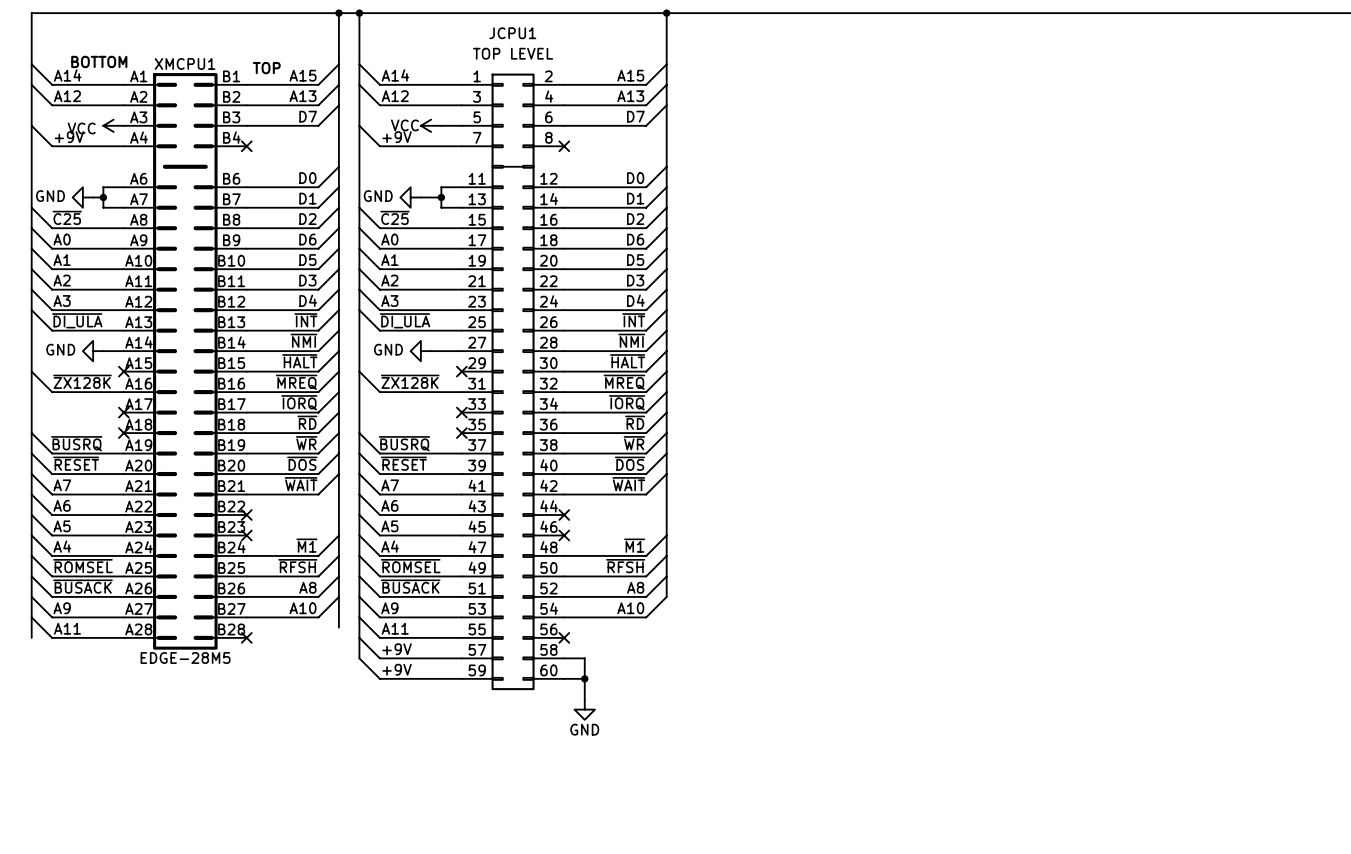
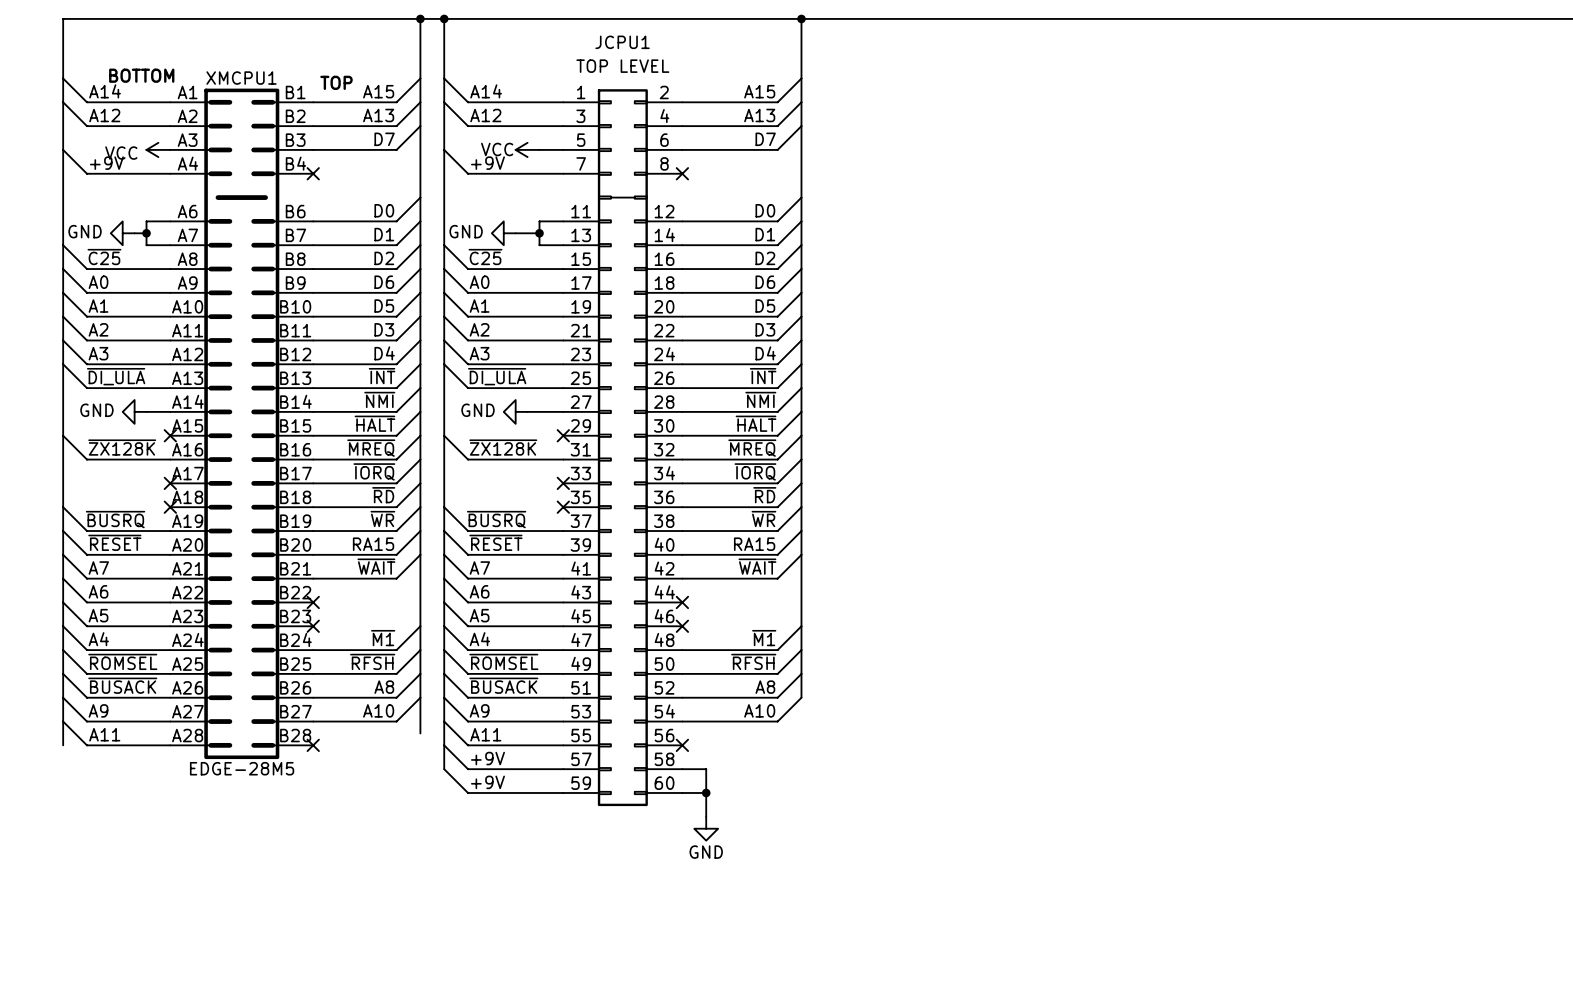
label: ~{DOS} (302, 463) -> RA15 (373, 544)
label: ~{DOS} (630, 463) -> RA15 (754, 544)

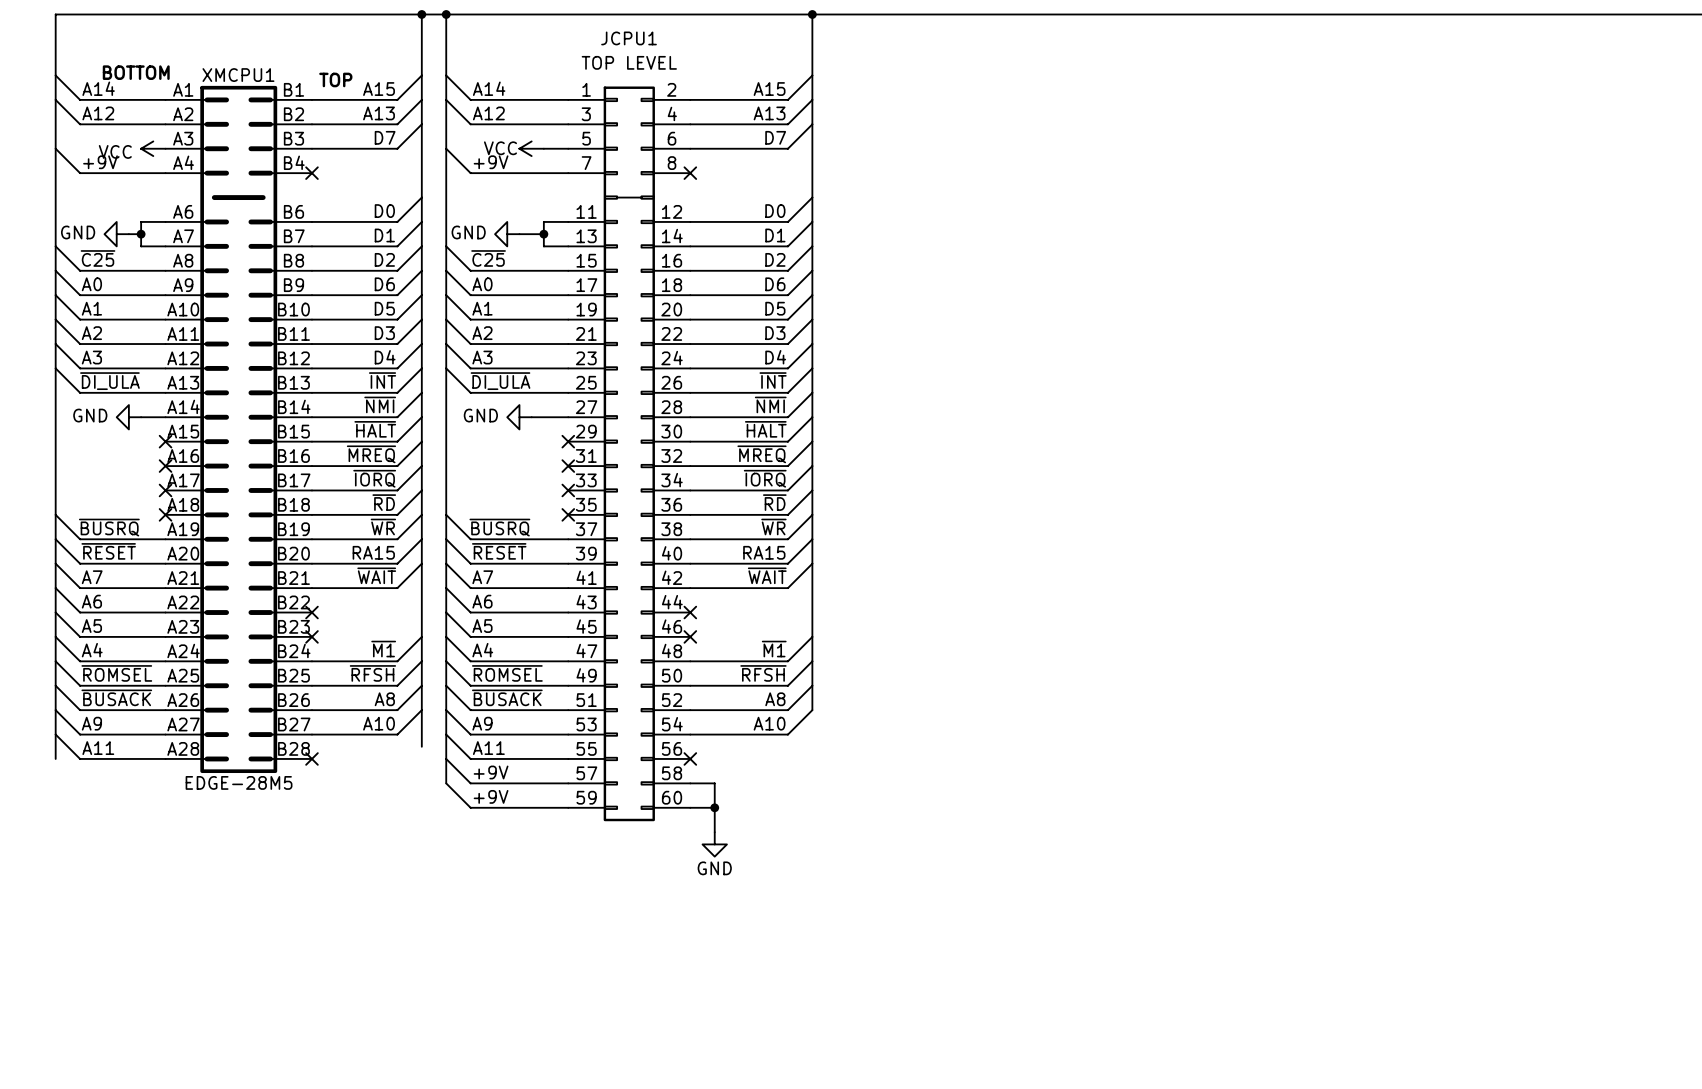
wire: (63, 435) (86, 459) (170, 459) -> none
wire: (444, 435) (468, 459) (563, 459) -> none
label: ~{ZX128K} (122, 447) -> none
label: ~{ZX128K} (503, 447) -> none
no-connect mark: none -> (165, 466)
no-connect mark: none -> (568, 466)

